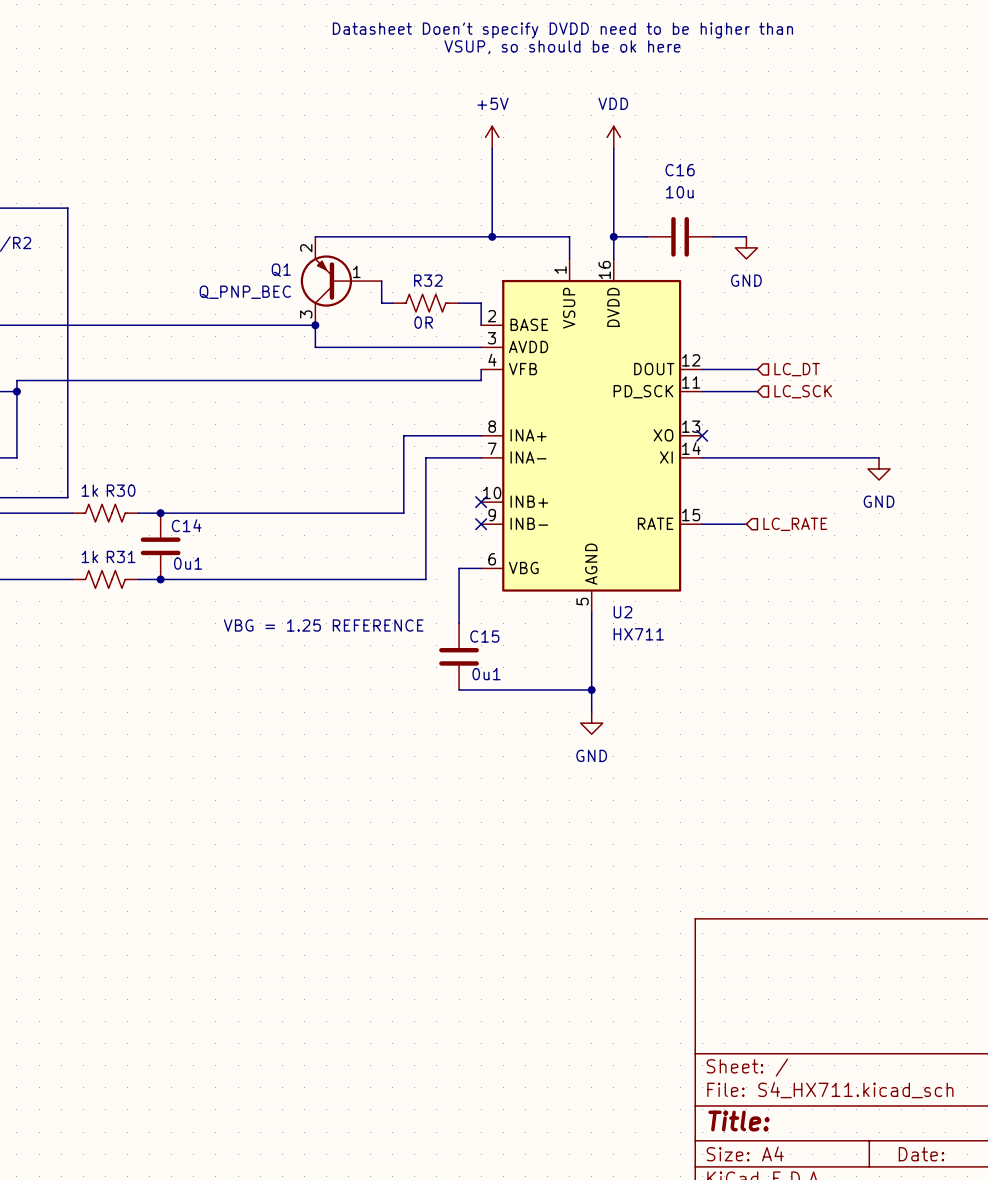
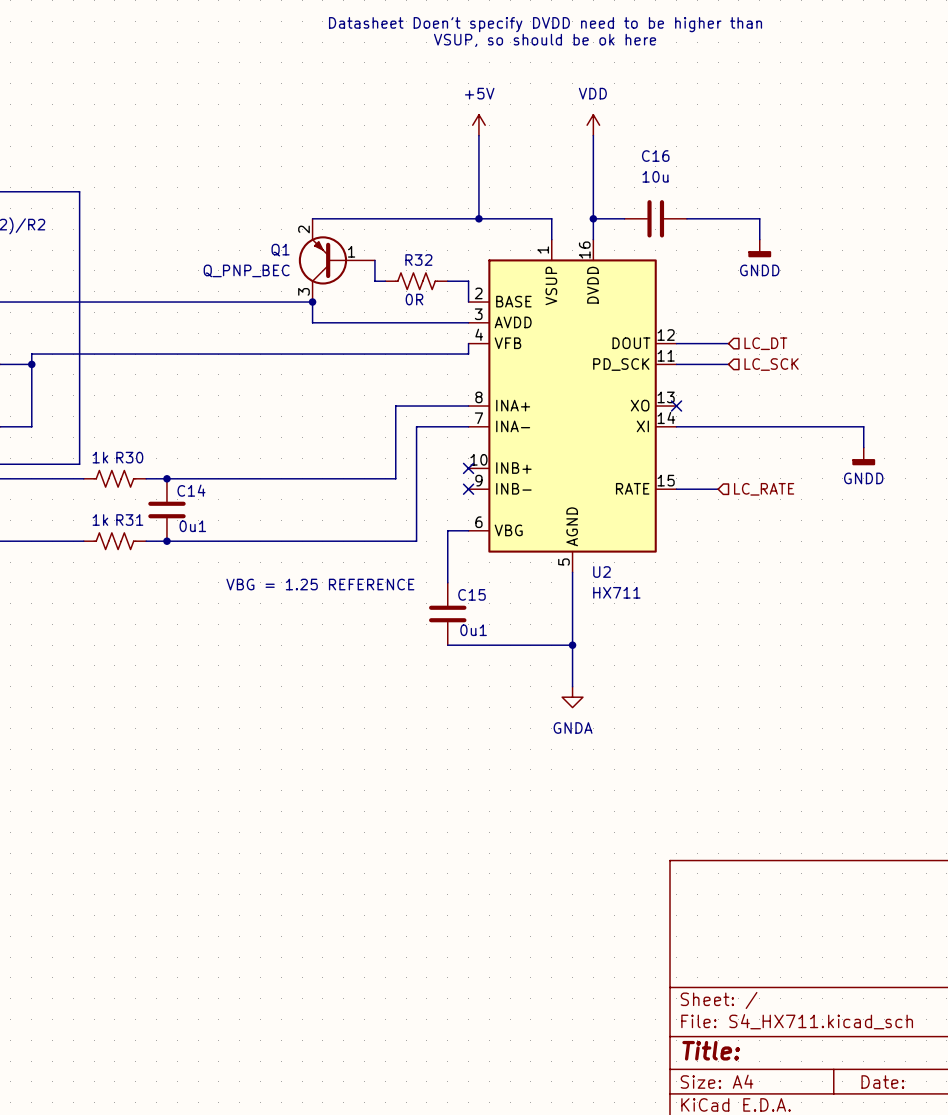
wire: none -> (718, 218) (759, 218) (759, 239)
power symbol: GND (746, 247) -> none
power symbol: none -> GNDD (759, 248)
wire: none -> (842, 426) (863, 426) (863, 447)
power symbol: GND (879, 468) -> none
power symbol: none -> GNDD (863, 456)
power symbol: GND (591, 723) -> none
power symbol: none -> GNDA (572, 697)

